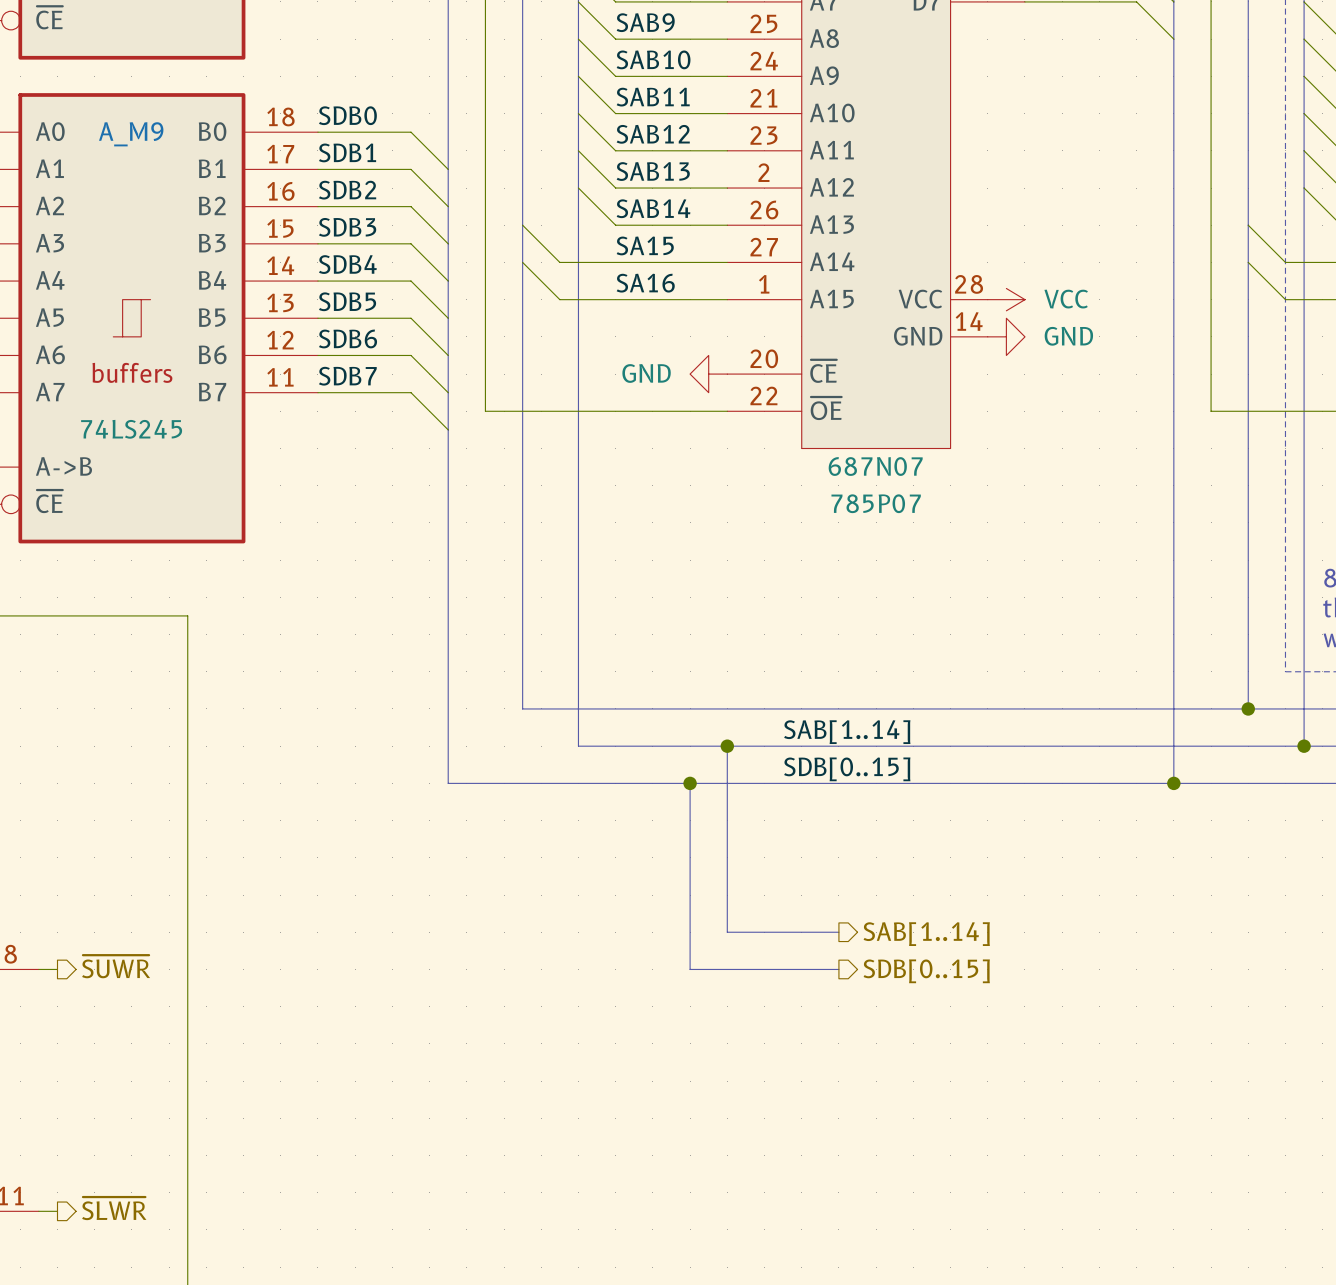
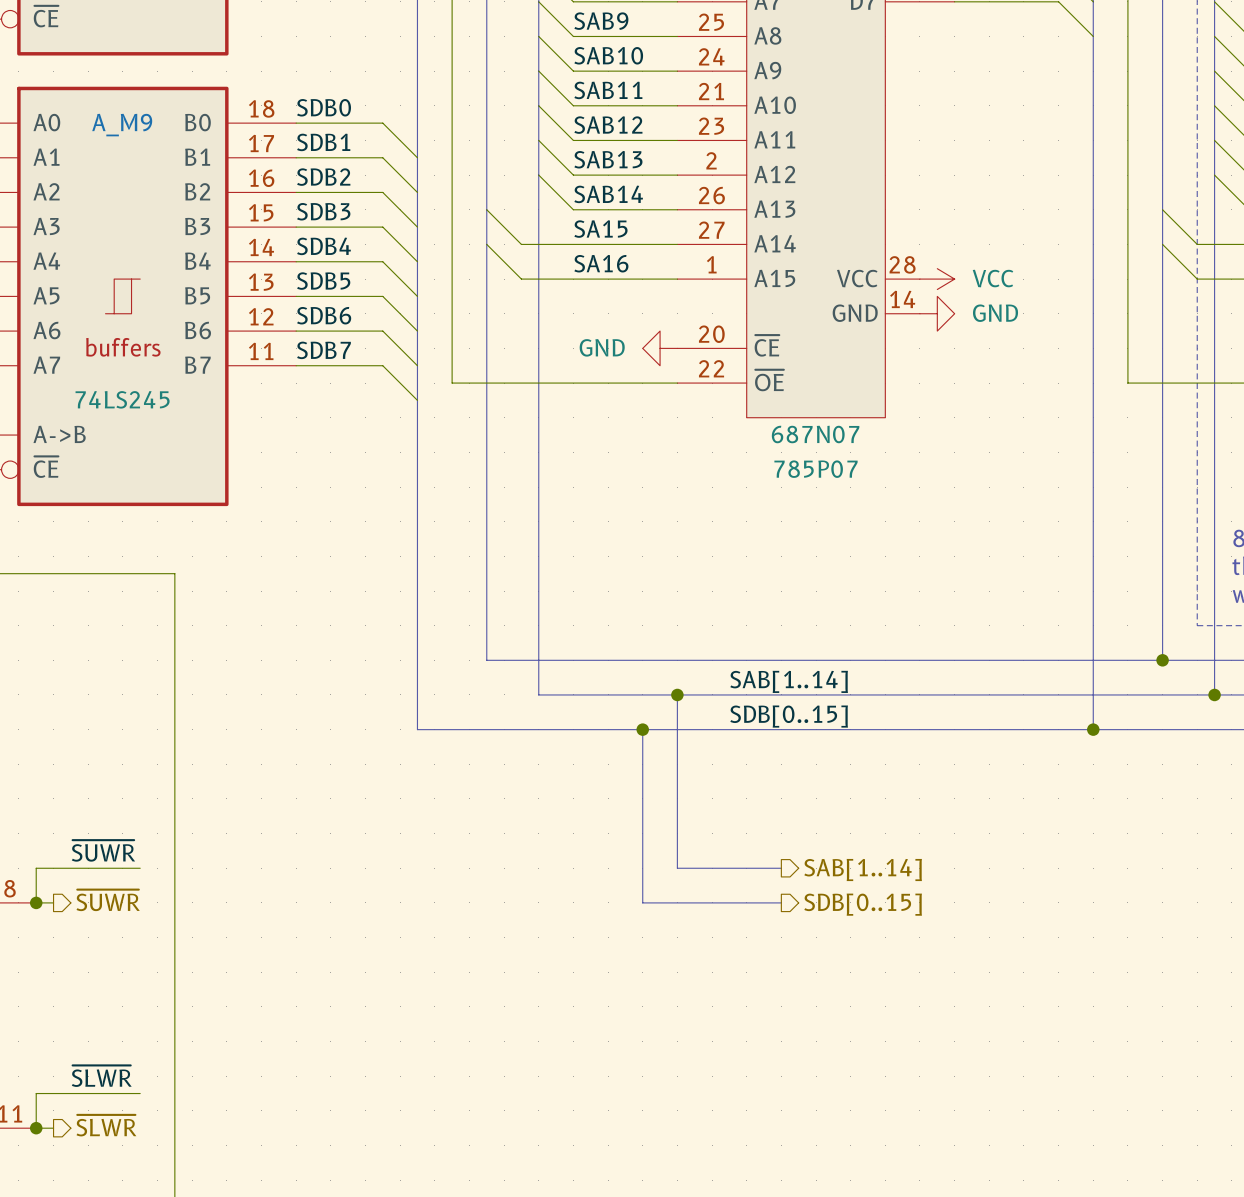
label: none -> ~{SUWR} (103, 850)
wire: none -> (140, 868) (36, 868) (36, 902)
junction: none -> (36, 902)
label: none -> ~{SLWR} (101, 1076)
wire: none -> (140, 1093) (36, 1093) (36, 1128)
junction: none -> (36, 1128)

